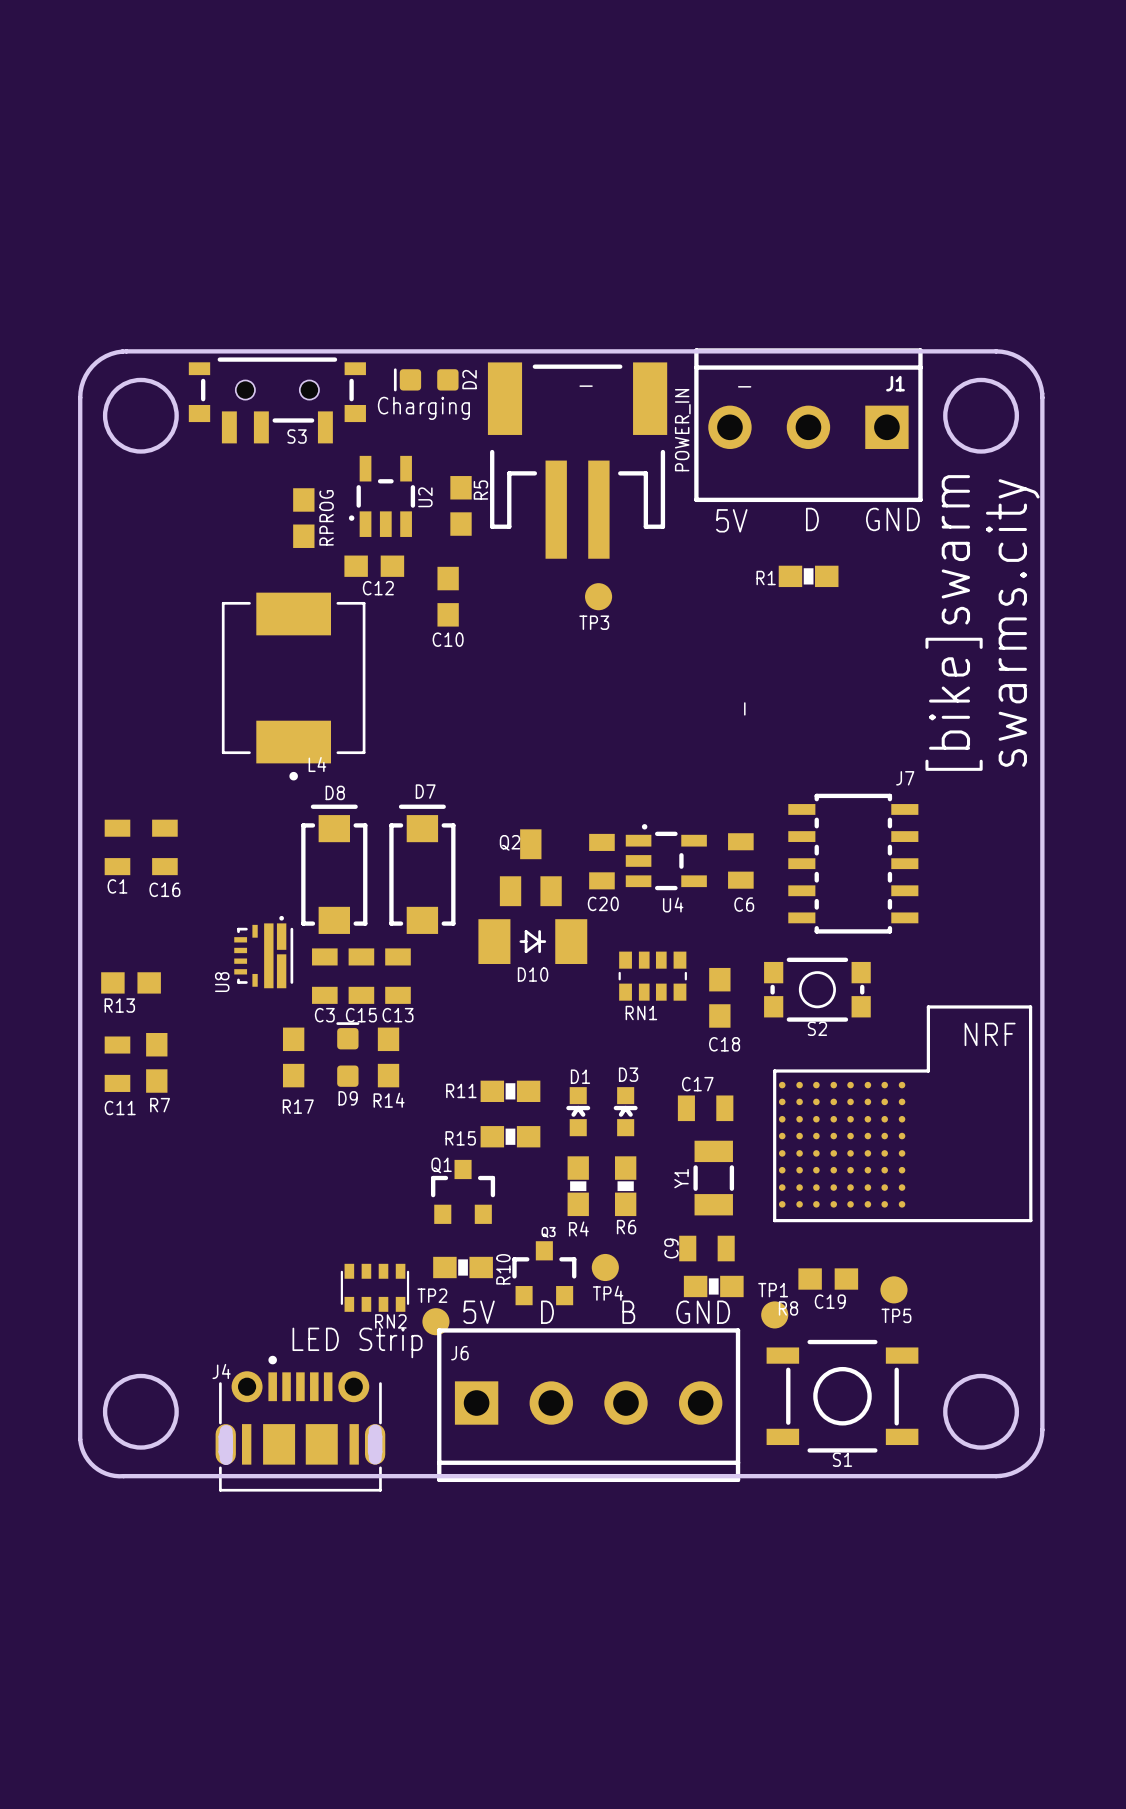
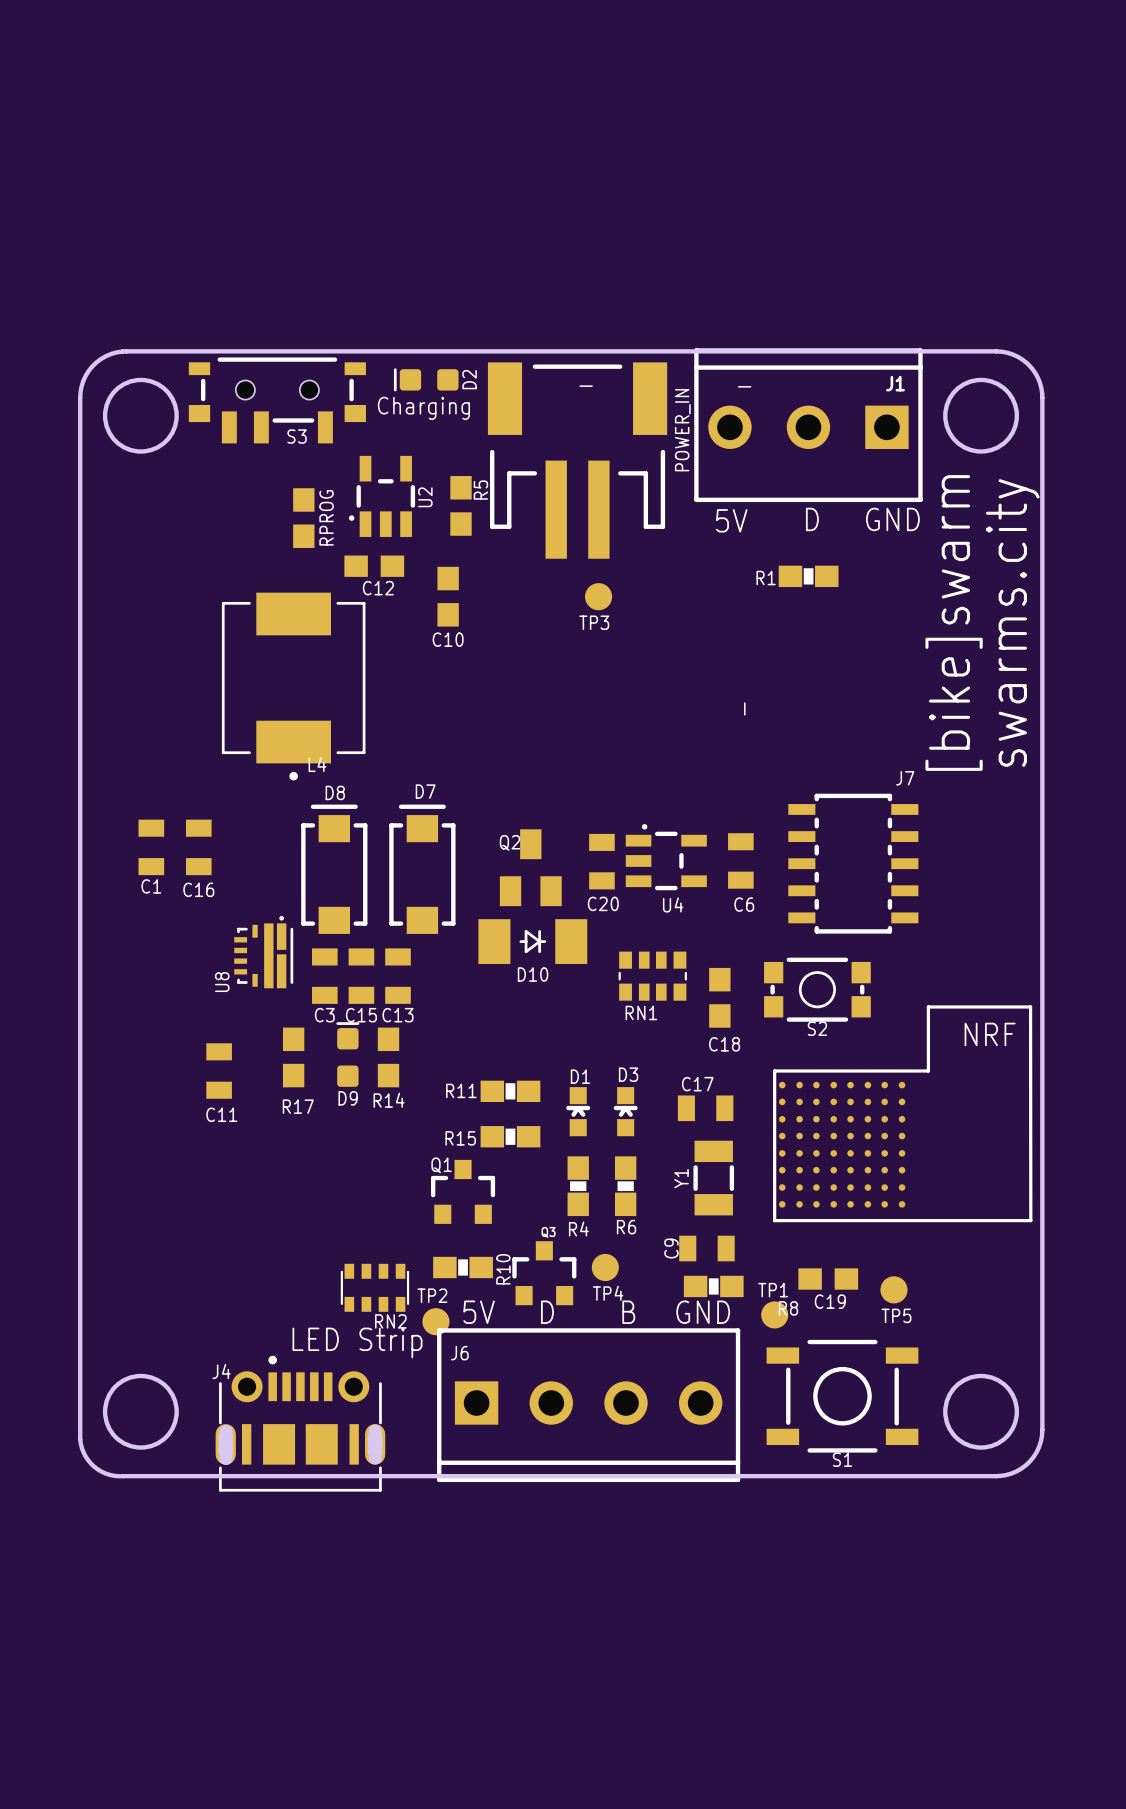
C1 position: (117, 847) -> (151, 847)
C16 position: (164, 847) -> (198, 847)
R13: (131, 982) -> none
R7: (156, 1062) -> none
C11 position: (117, 1064) -> (219, 1071)

